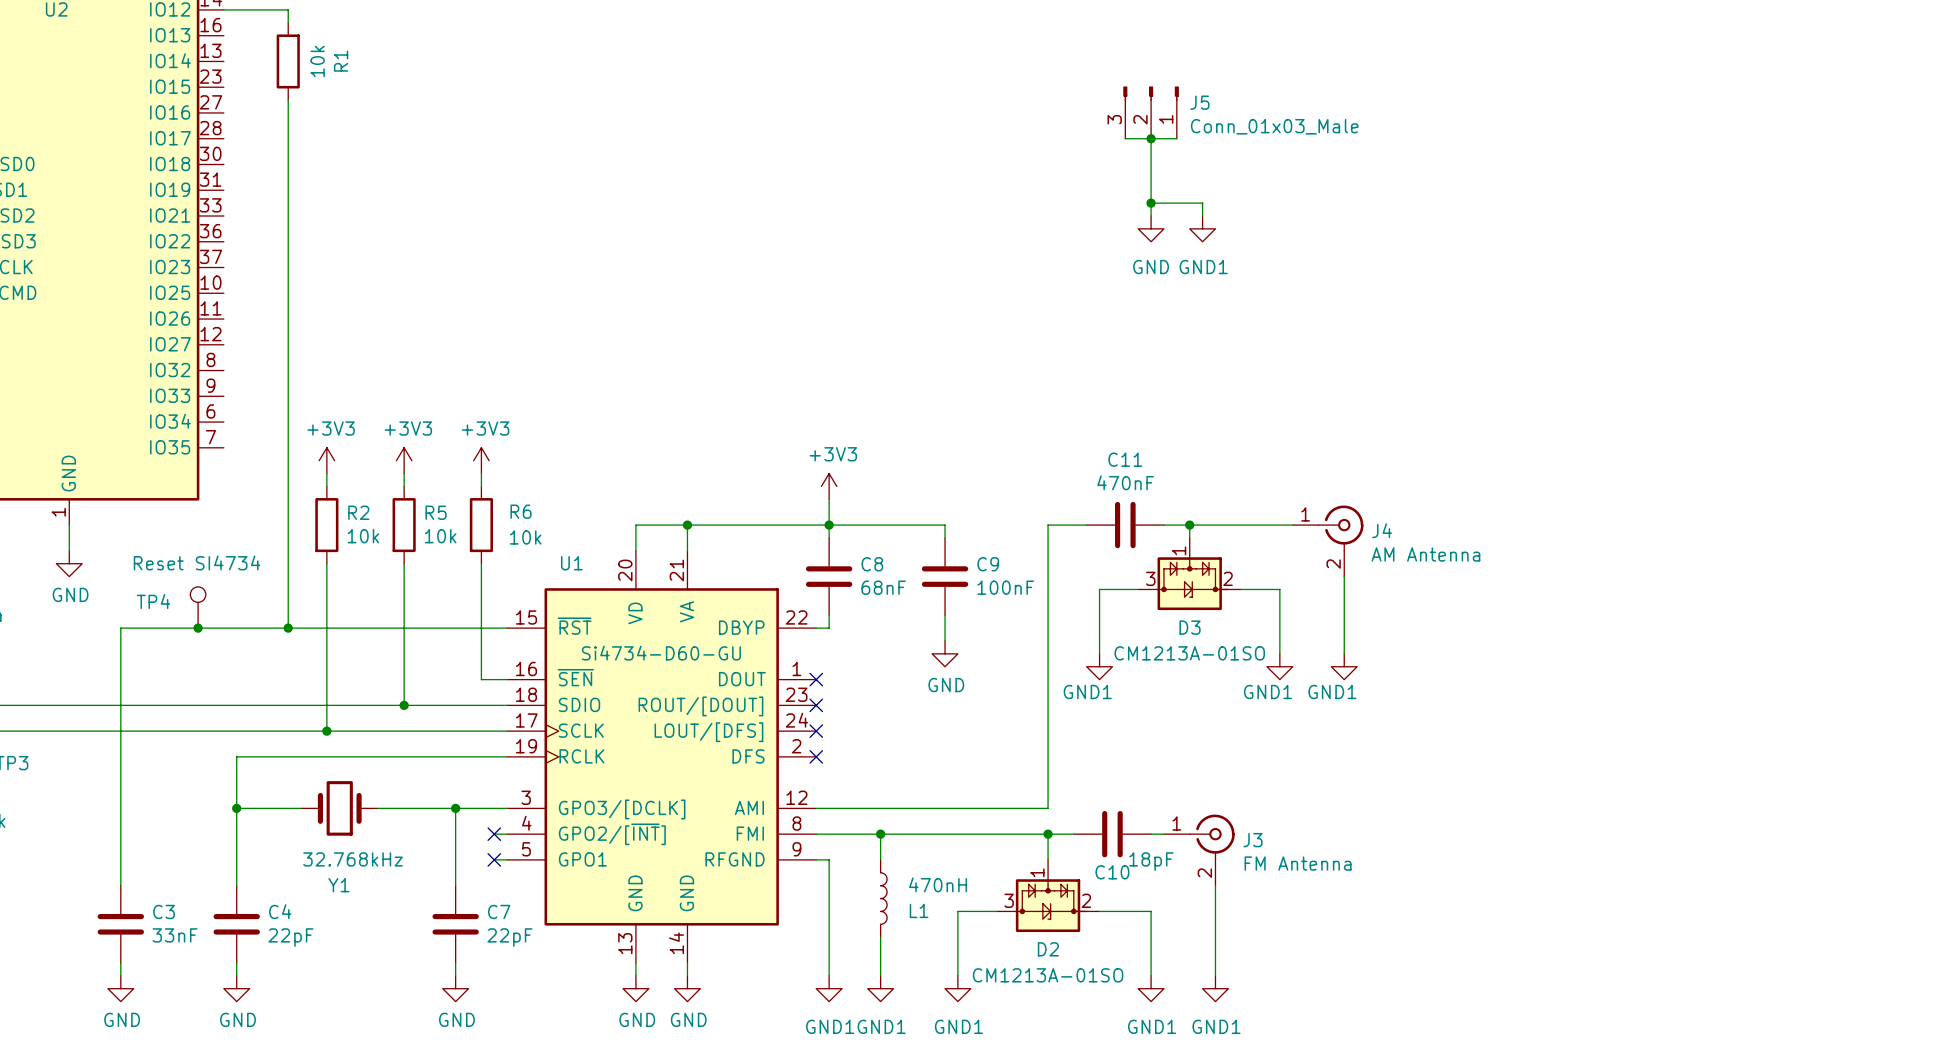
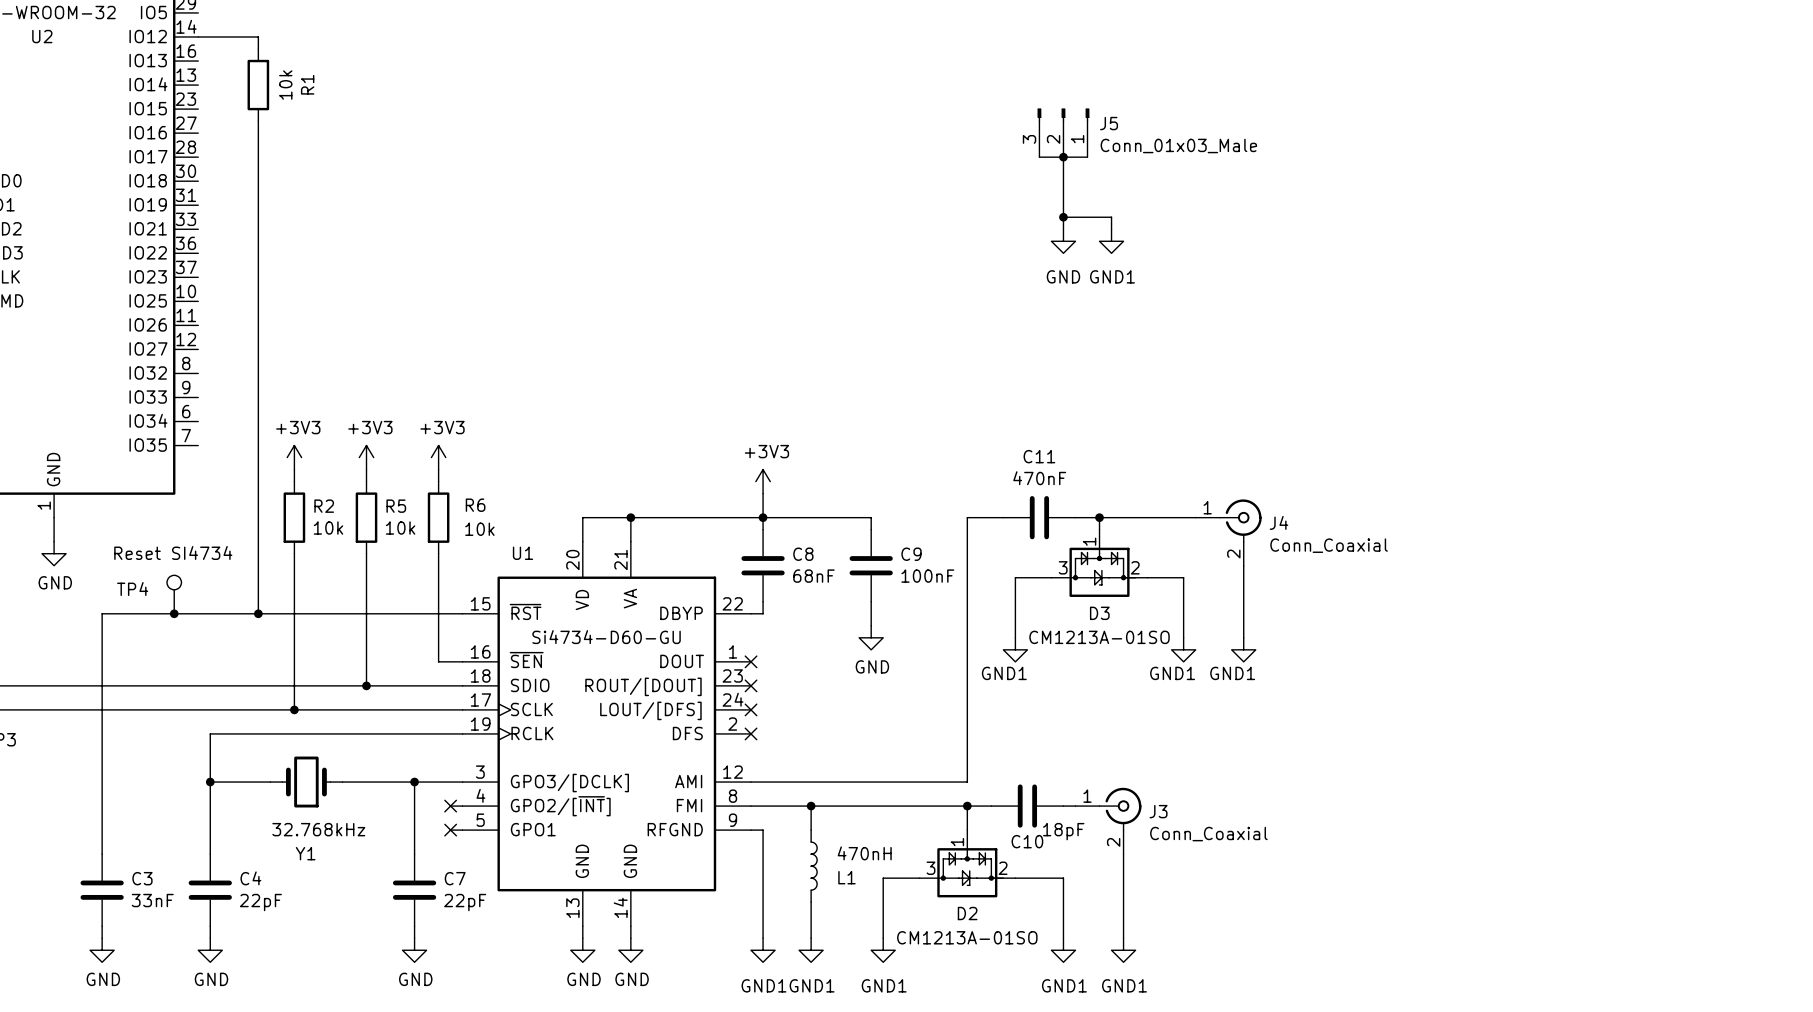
J4 value: AM Antenna (1425, 554) -> Conn_Coaxial (1329, 545)
J3 value: FM Antenna (1298, 863) -> Conn_Coaxial (1208, 834)

